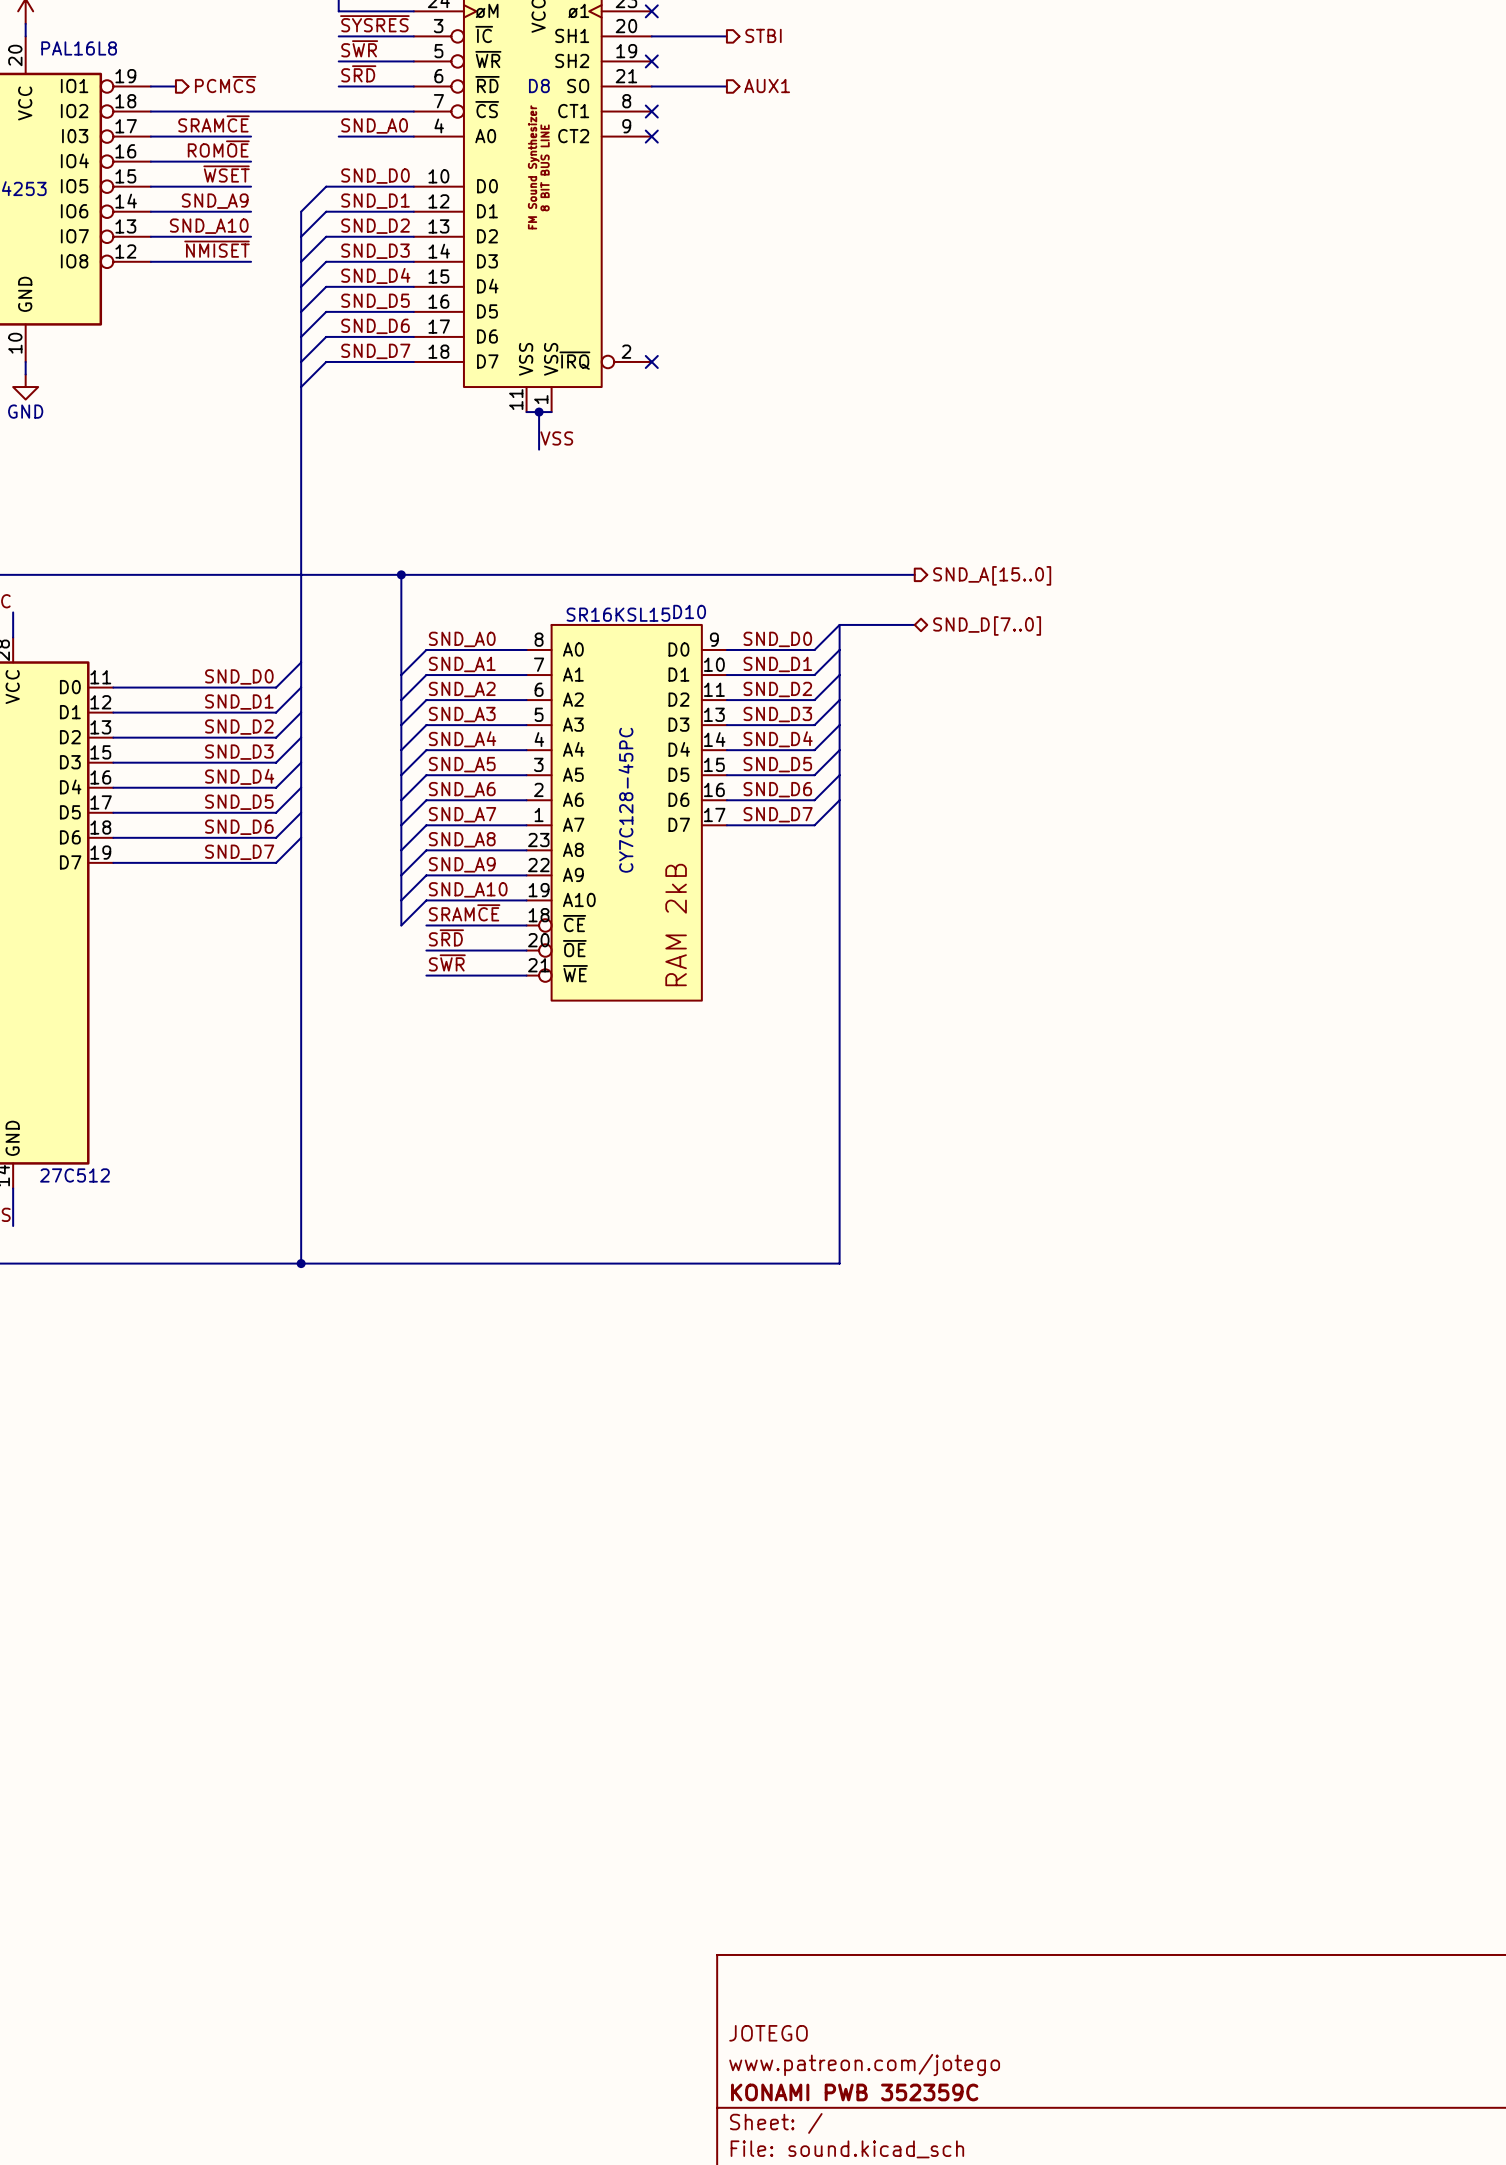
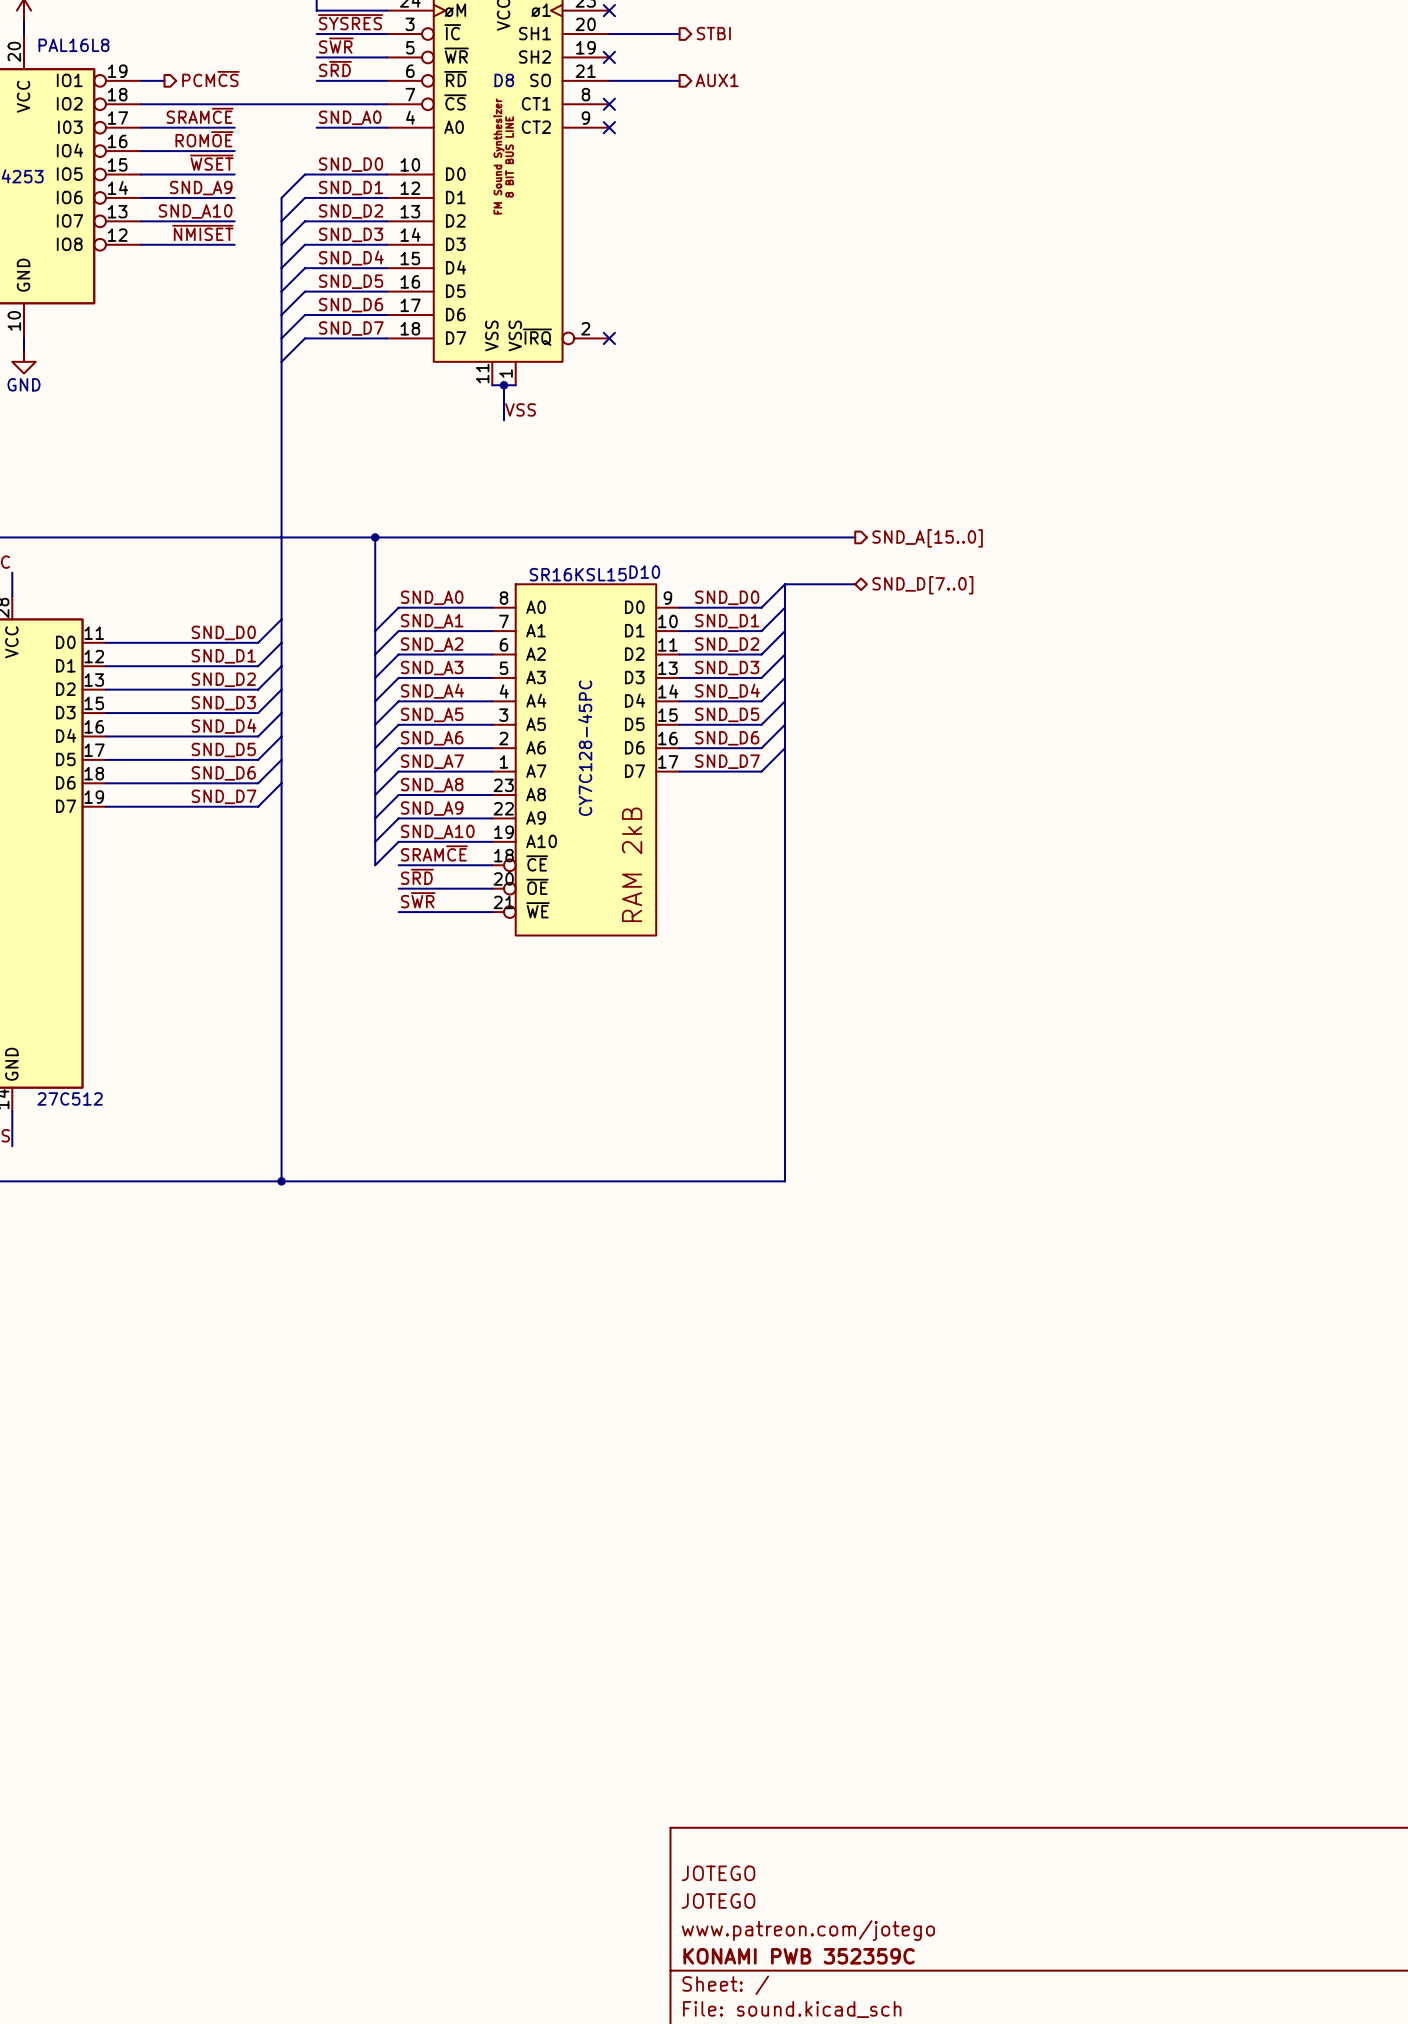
title block: none -> JOTEGO (718, 1873)

